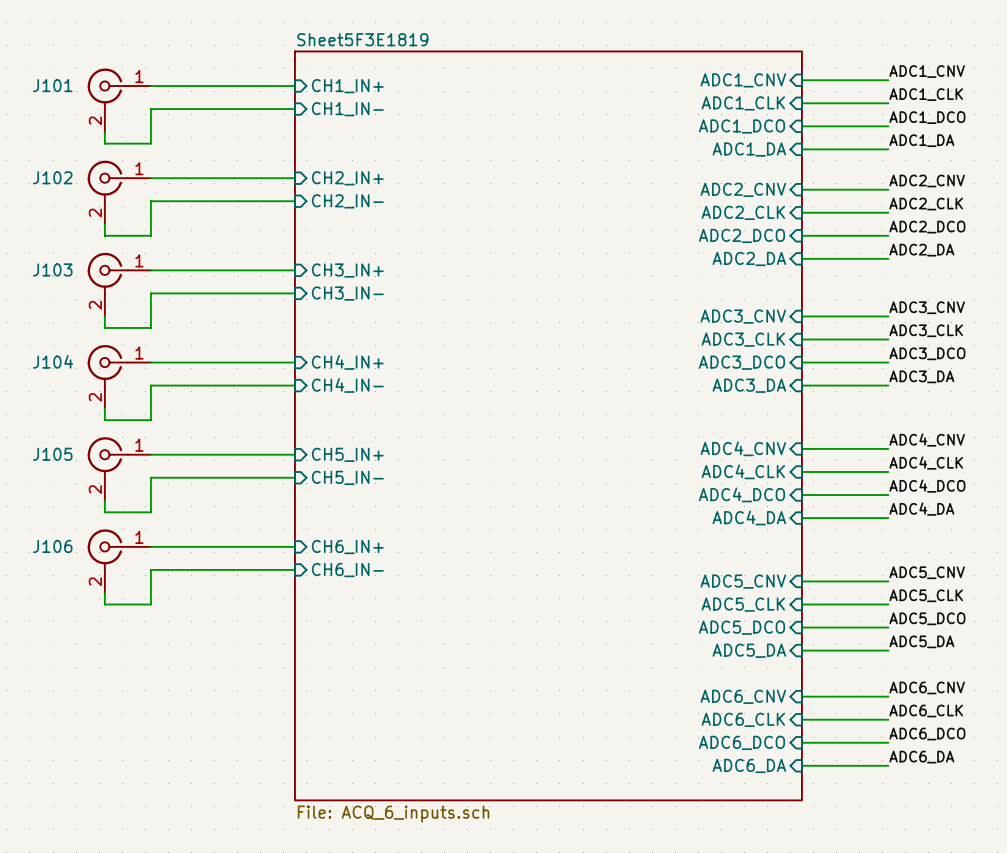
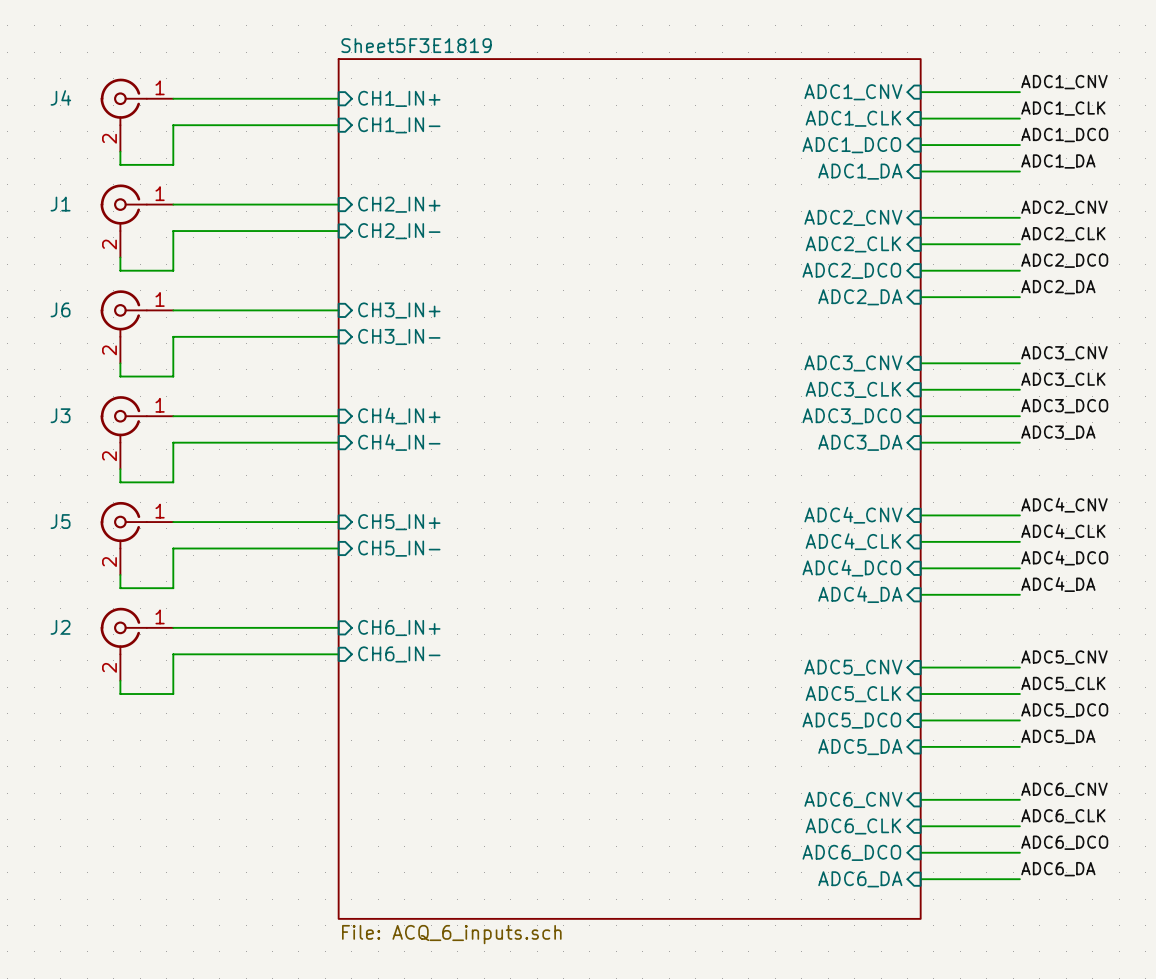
J101 name: J101 (52, 85) -> J4 (60, 97)
J102 name: J102 (52, 177) -> J1 (60, 204)
J103 name: J103 (52, 269) -> J6 (60, 309)
J104 name: J104 (53, 361) -> J3 (60, 415)
J105 name: J105 (52, 454) -> J5 (60, 521)
J106 name: J106 (52, 546) -> J2 (60, 627)

